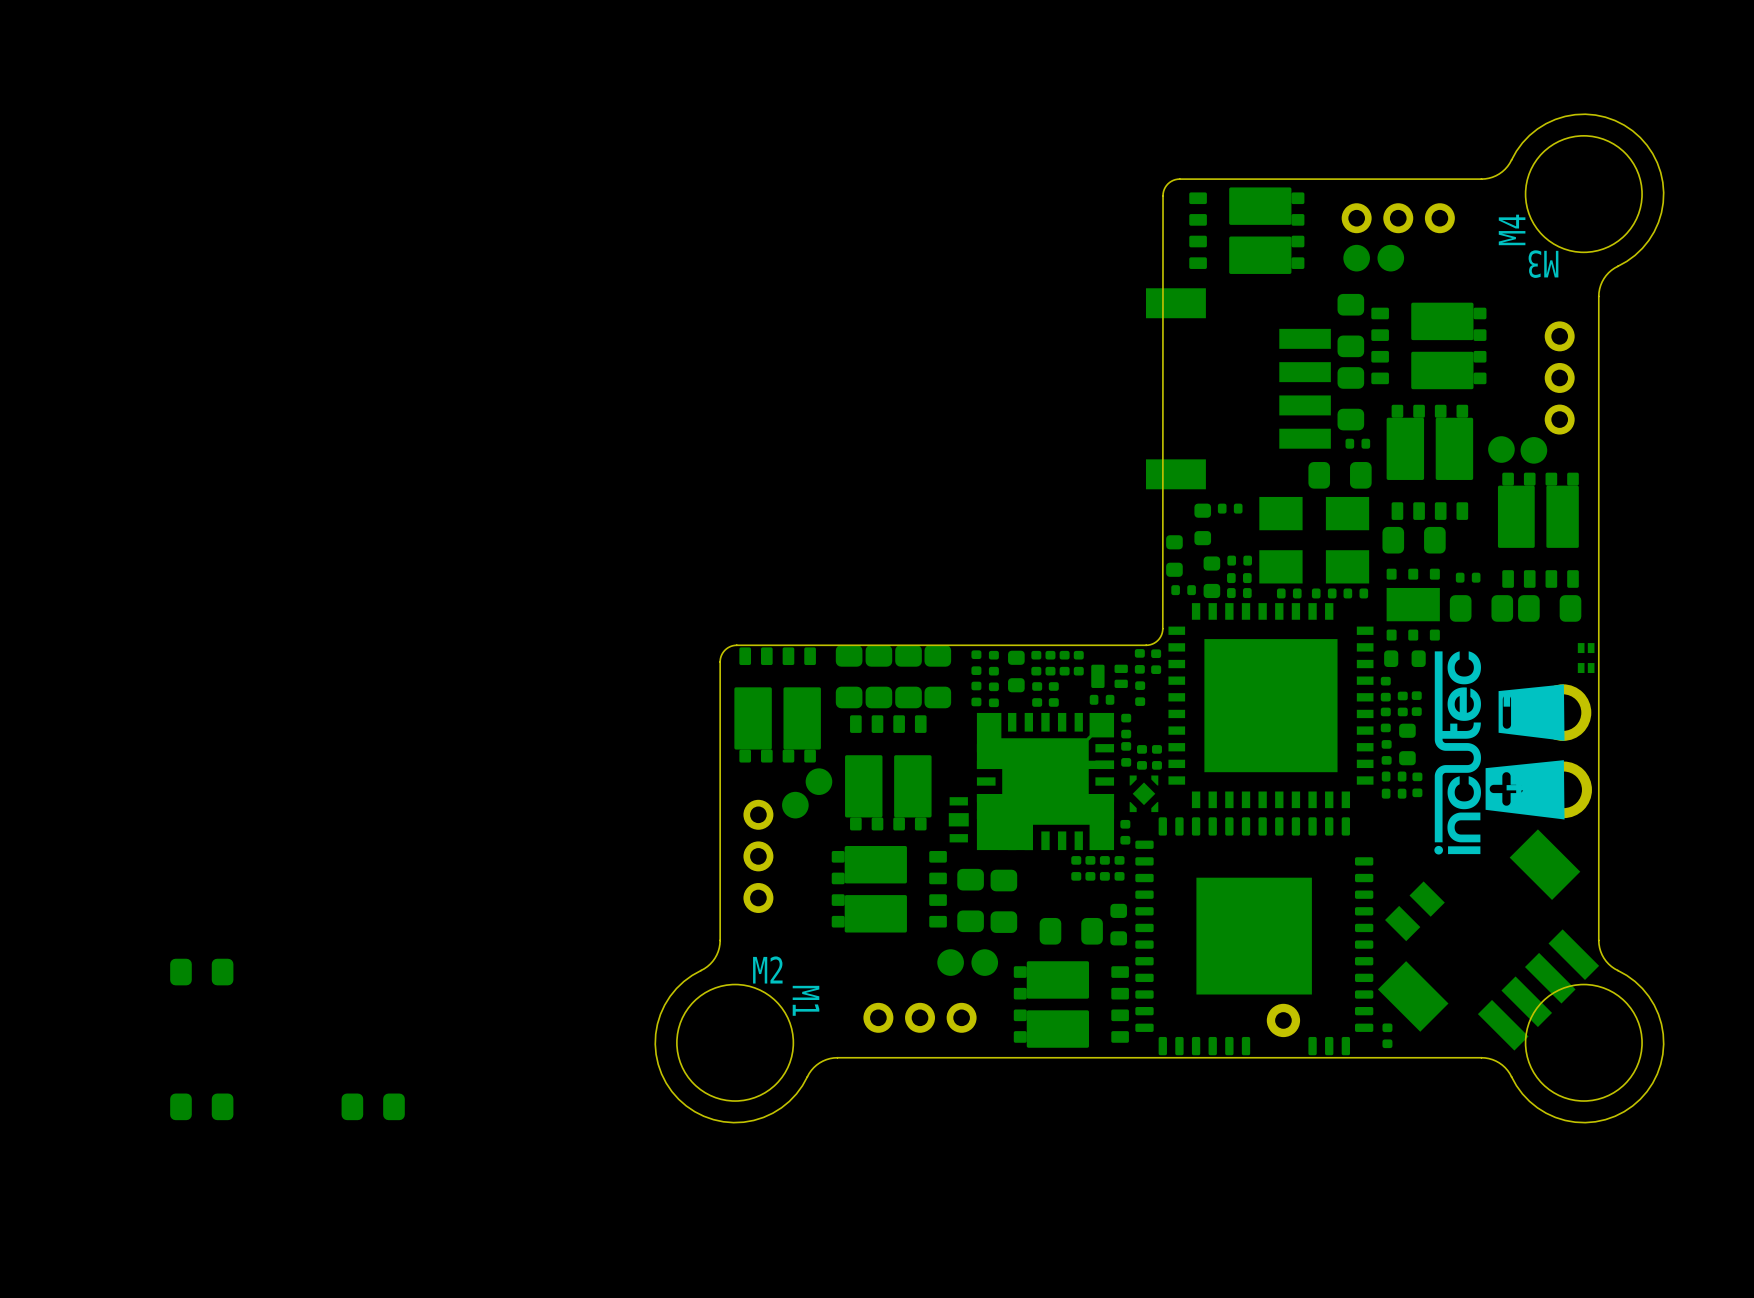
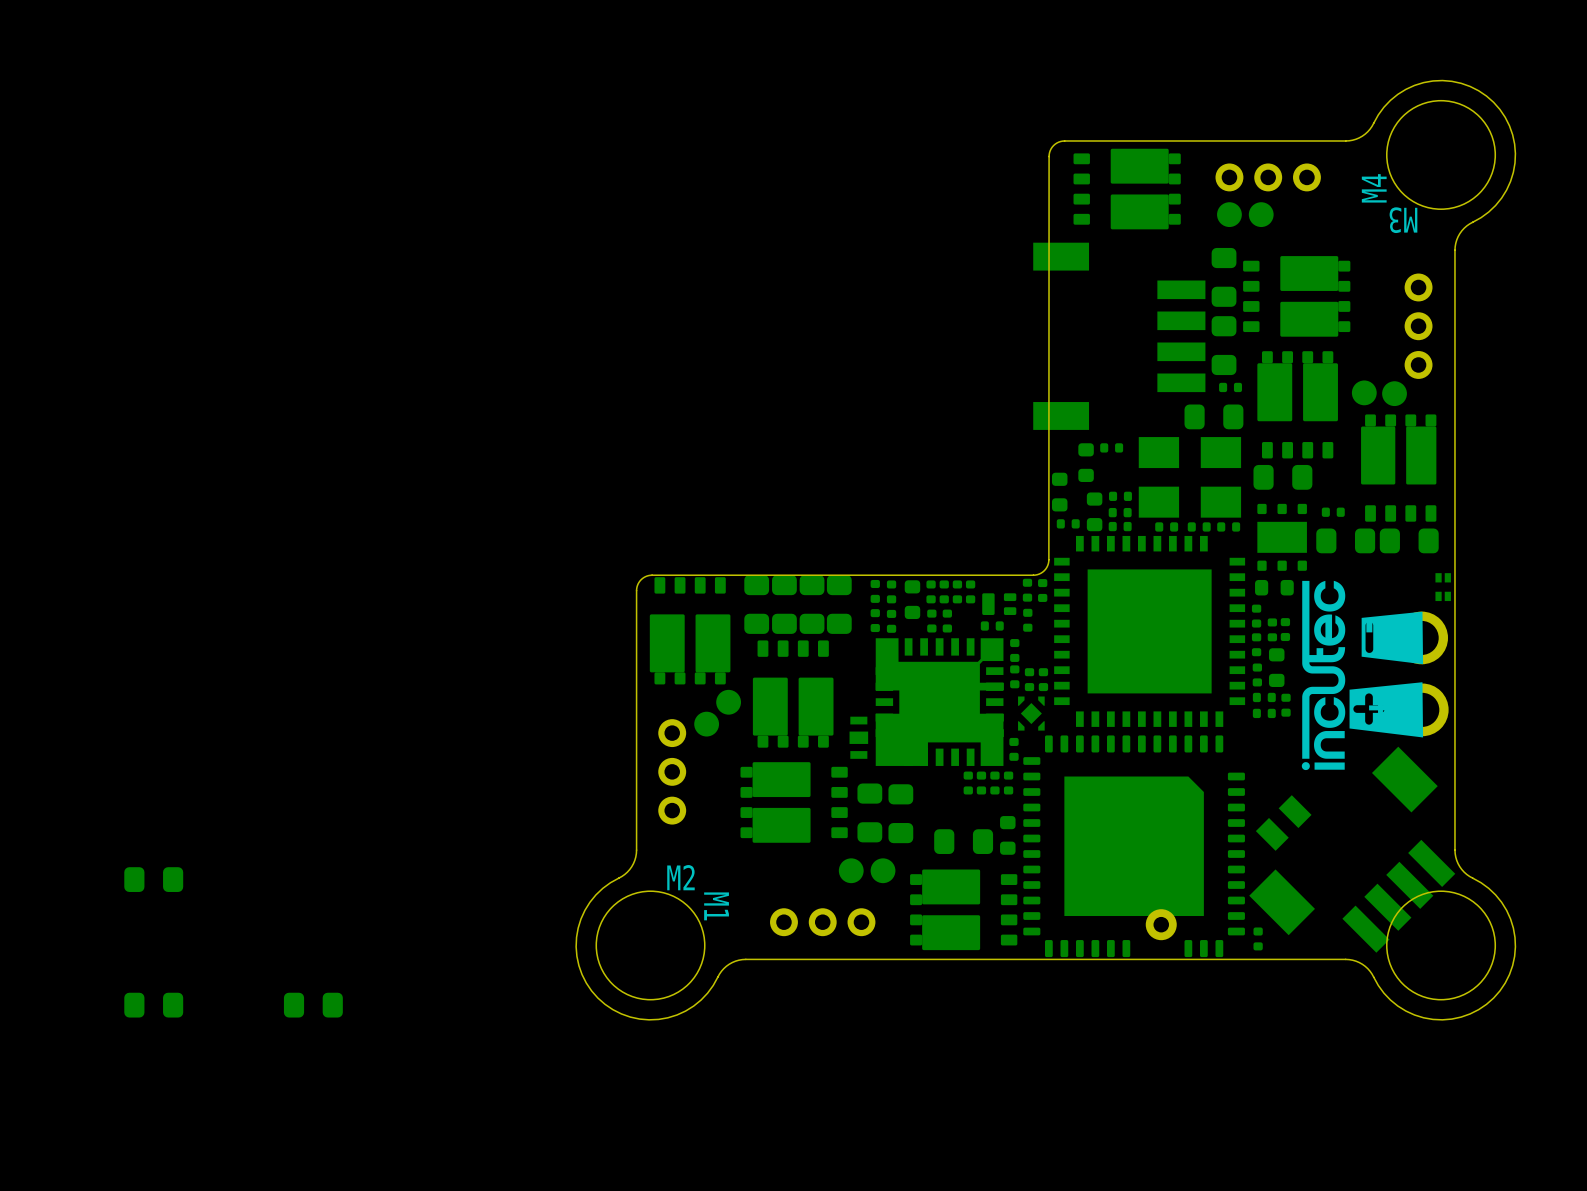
part footprint: [1135, 817, 1374, 1056] -> [1023, 735, 1245, 958]

